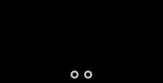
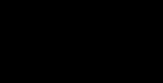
via: (74, 74) -> none
via: (88, 74) -> none

